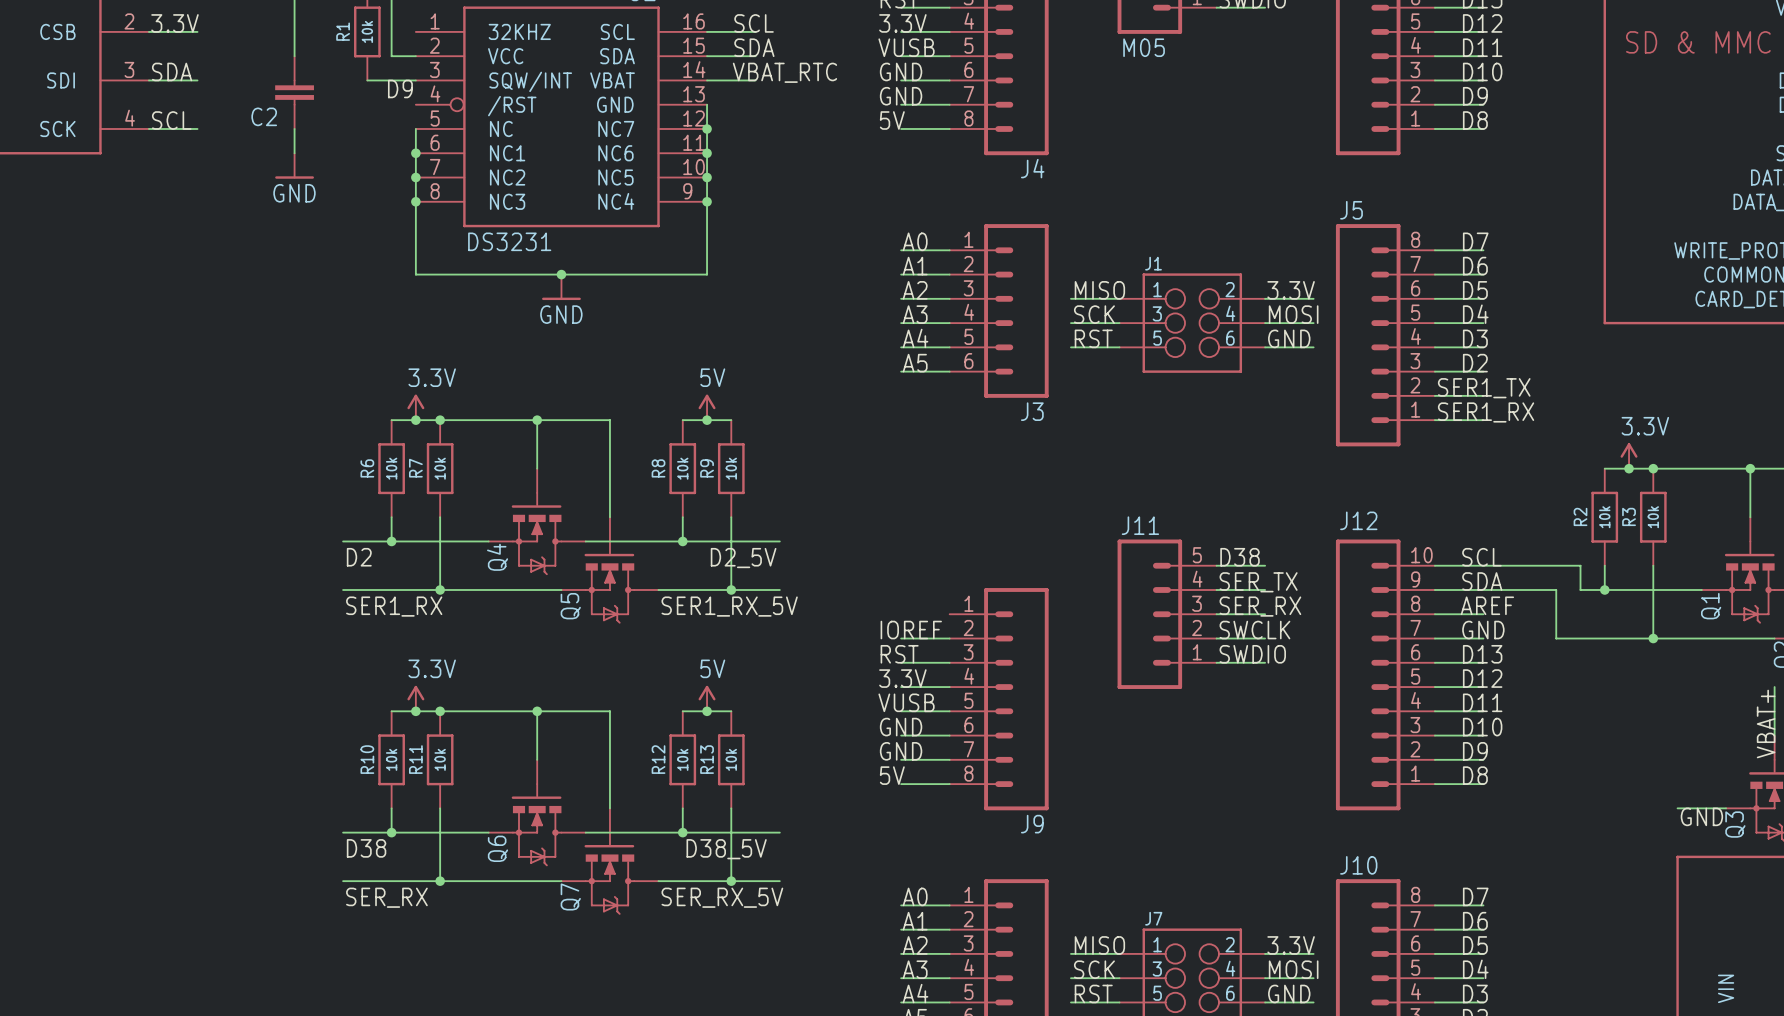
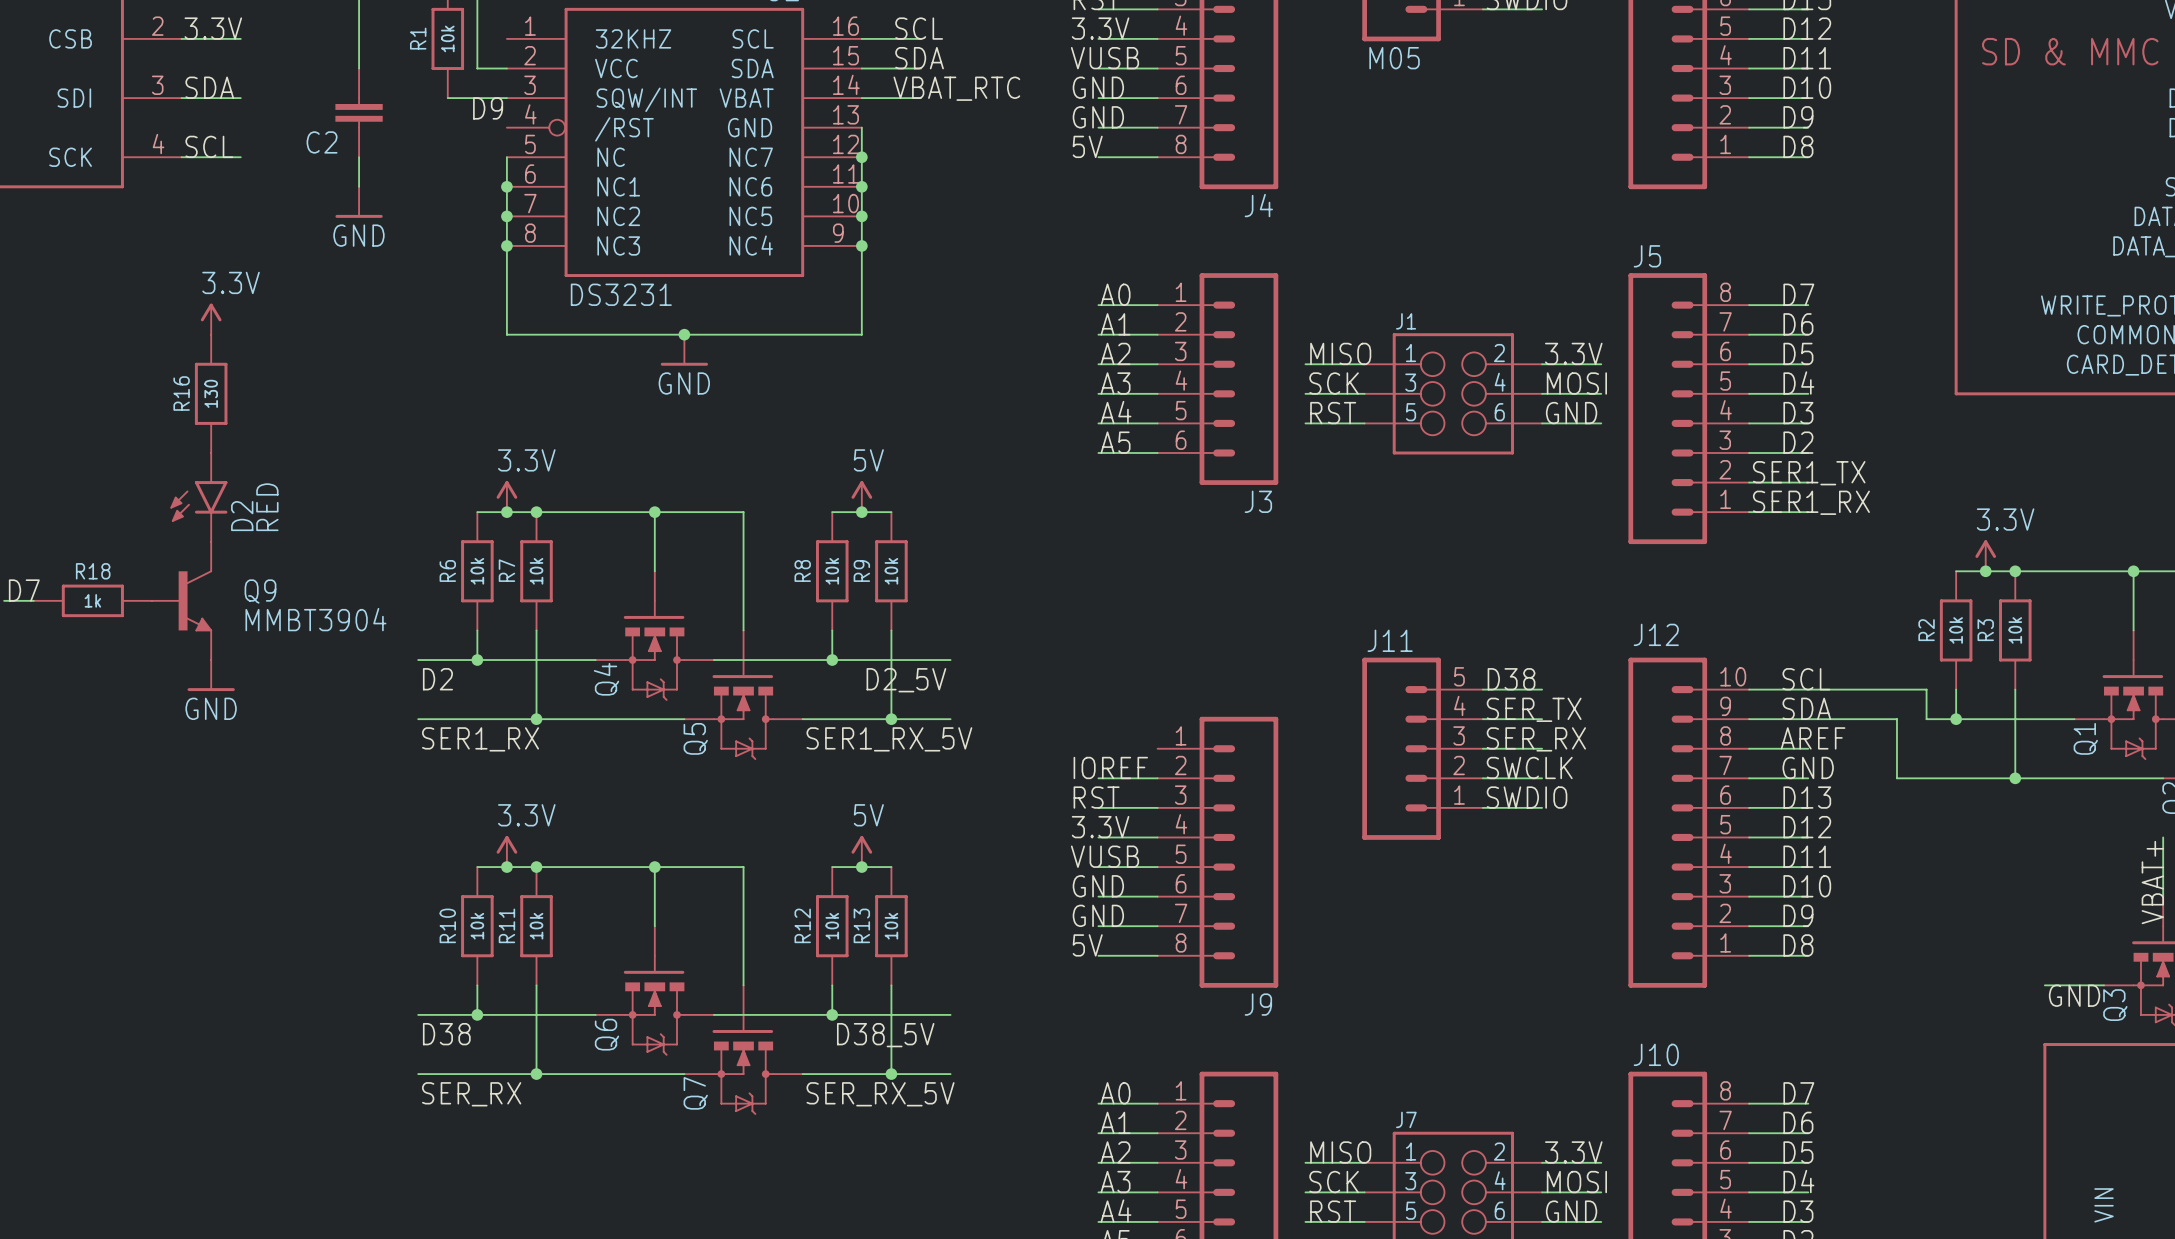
power symbol: none -> 3.3V (211, 319)
R16: none -> 130 (211, 393)
D2: none -> RED (198, 497)
label: none -> D7 (24, 590)
wire: none -> (4, 600) (33, 600)
R18: none -> 1k (92, 600)
Q9: none -> MMBT3904 (182, 600)
power symbol: none -> GND (211, 675)

